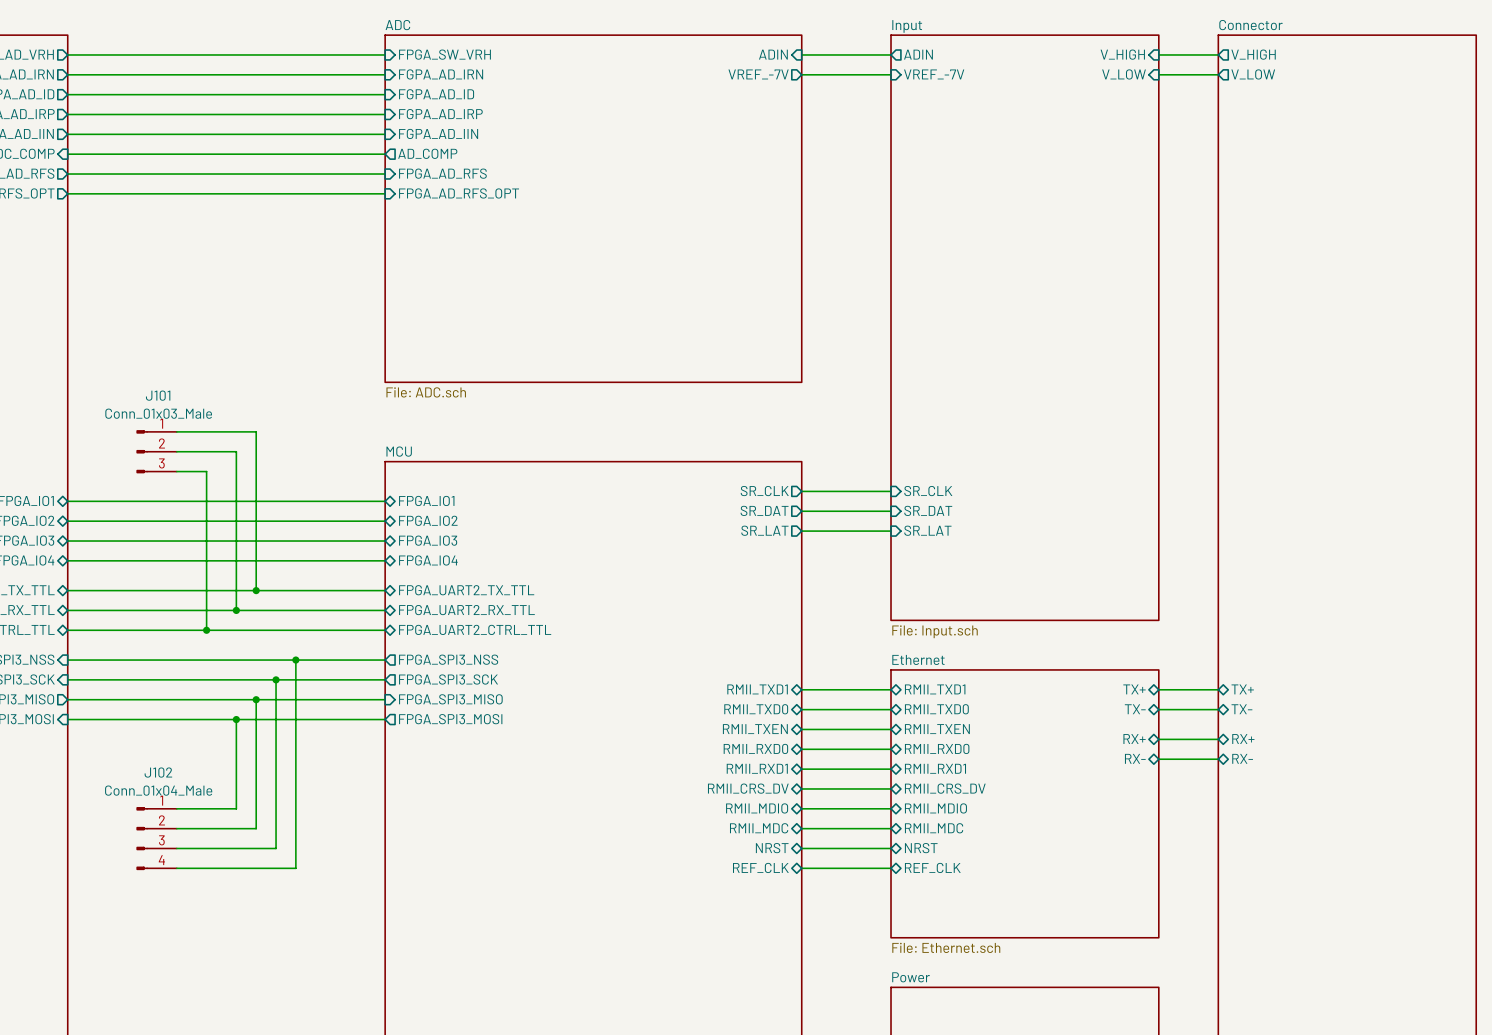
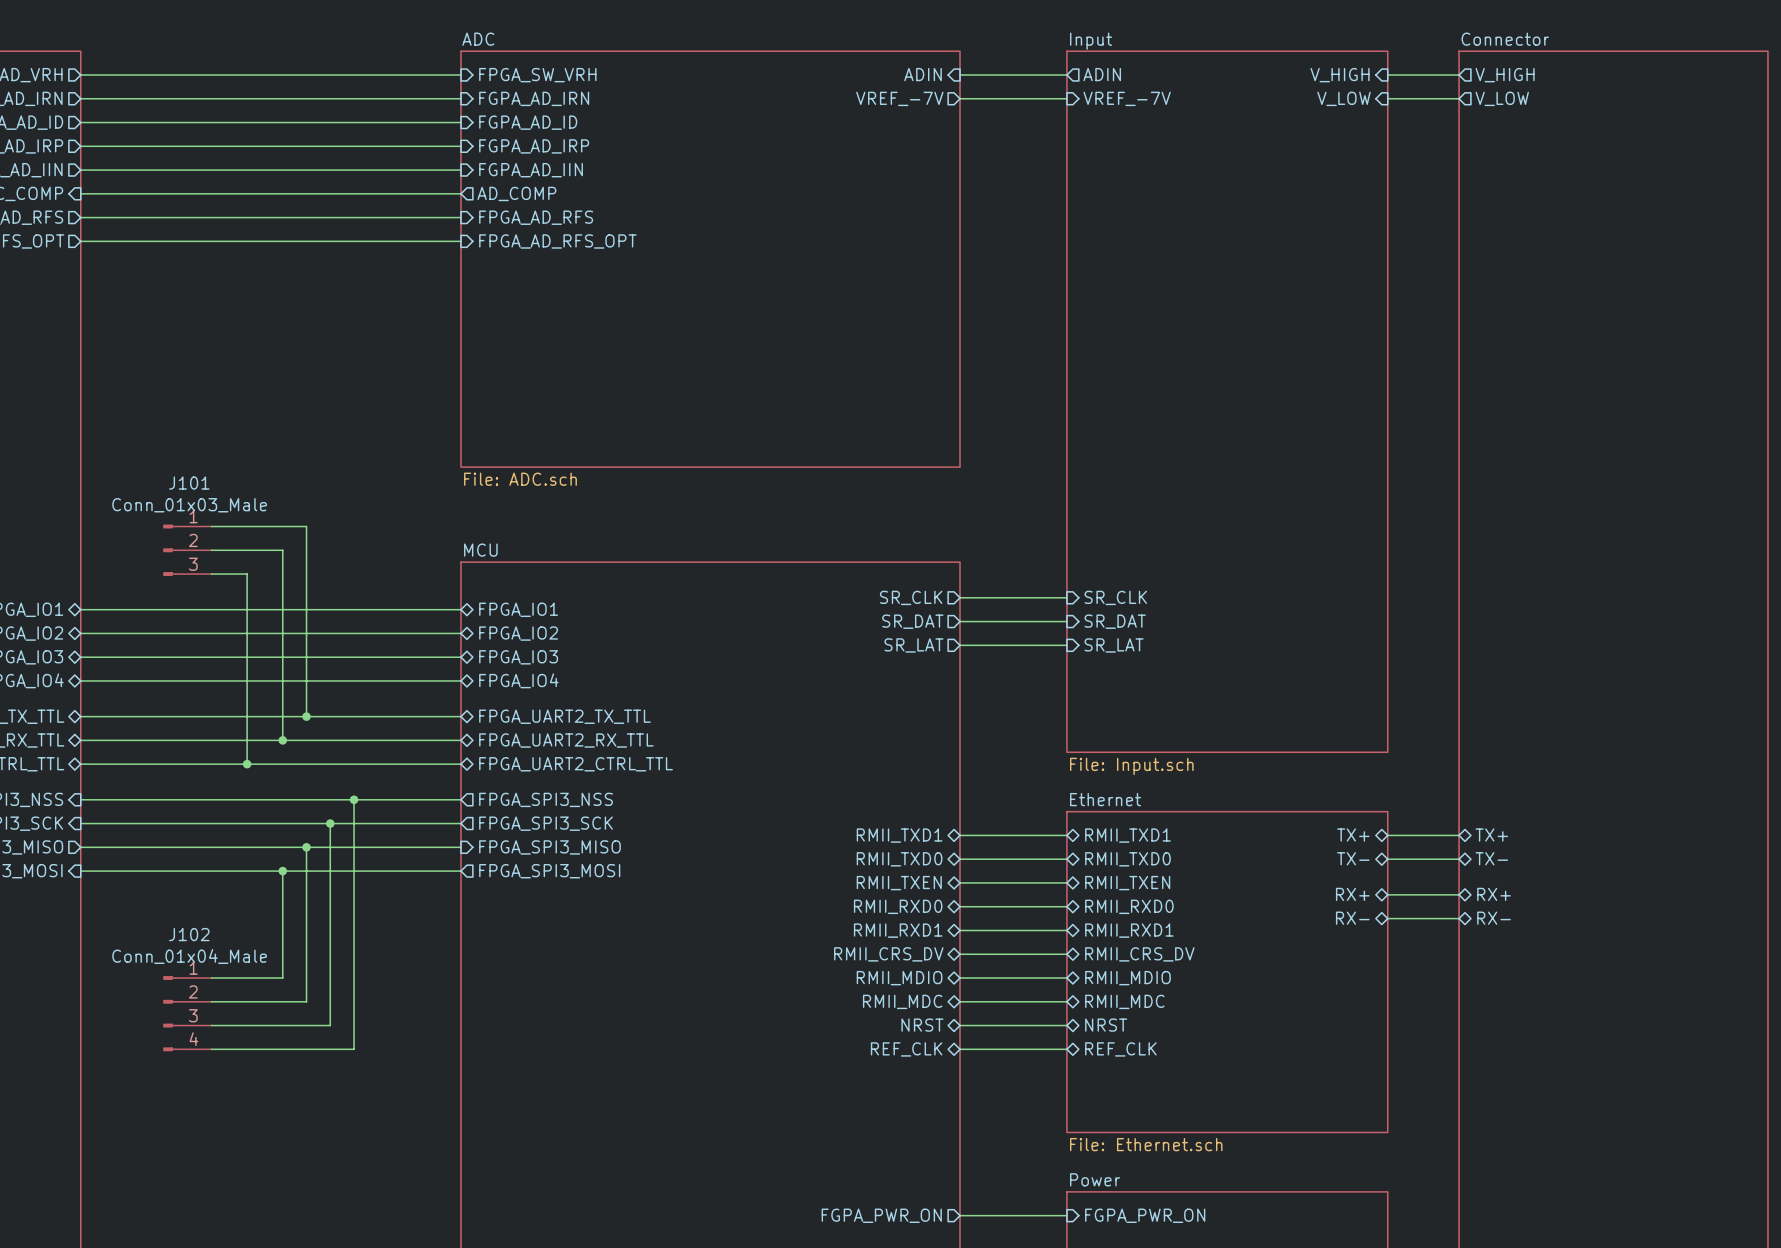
sheet pin: none -> FGPA_PWR_ON (881, 1215)
sheet pin: none -> FGPA_PWR_ON (1145, 1215)
wire: none -> (960, 1215) (1066, 1215)

